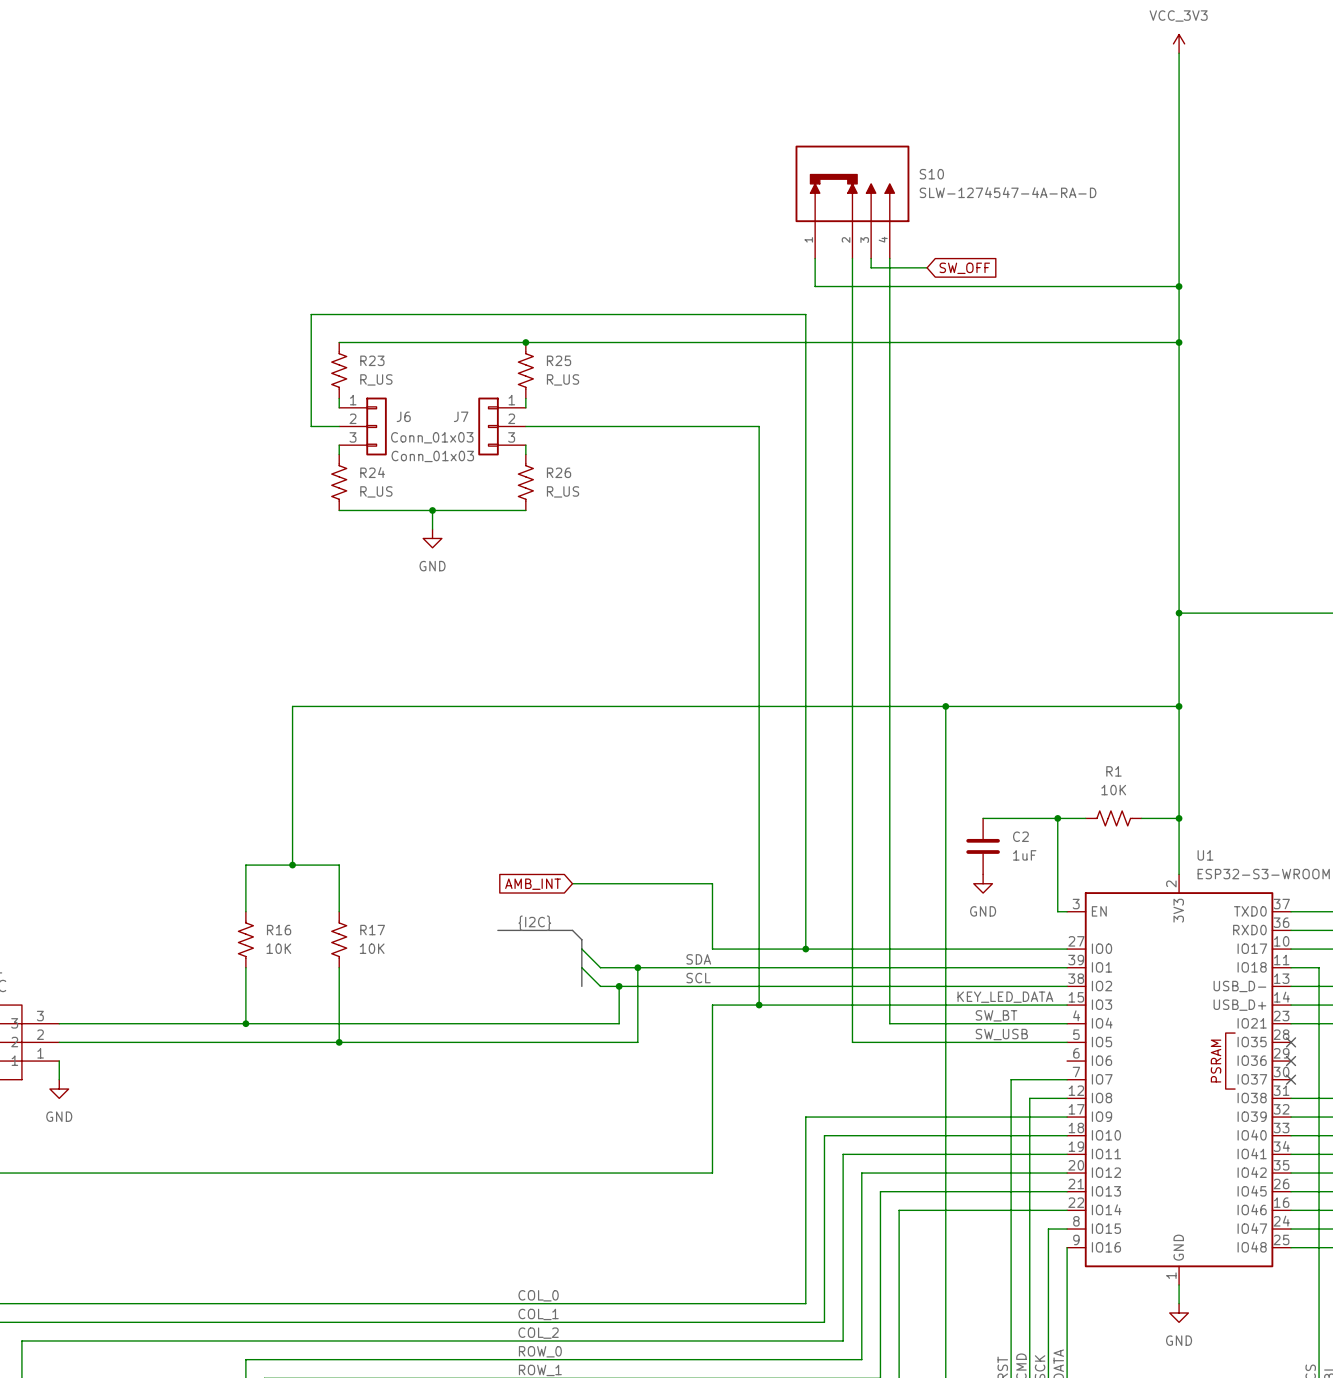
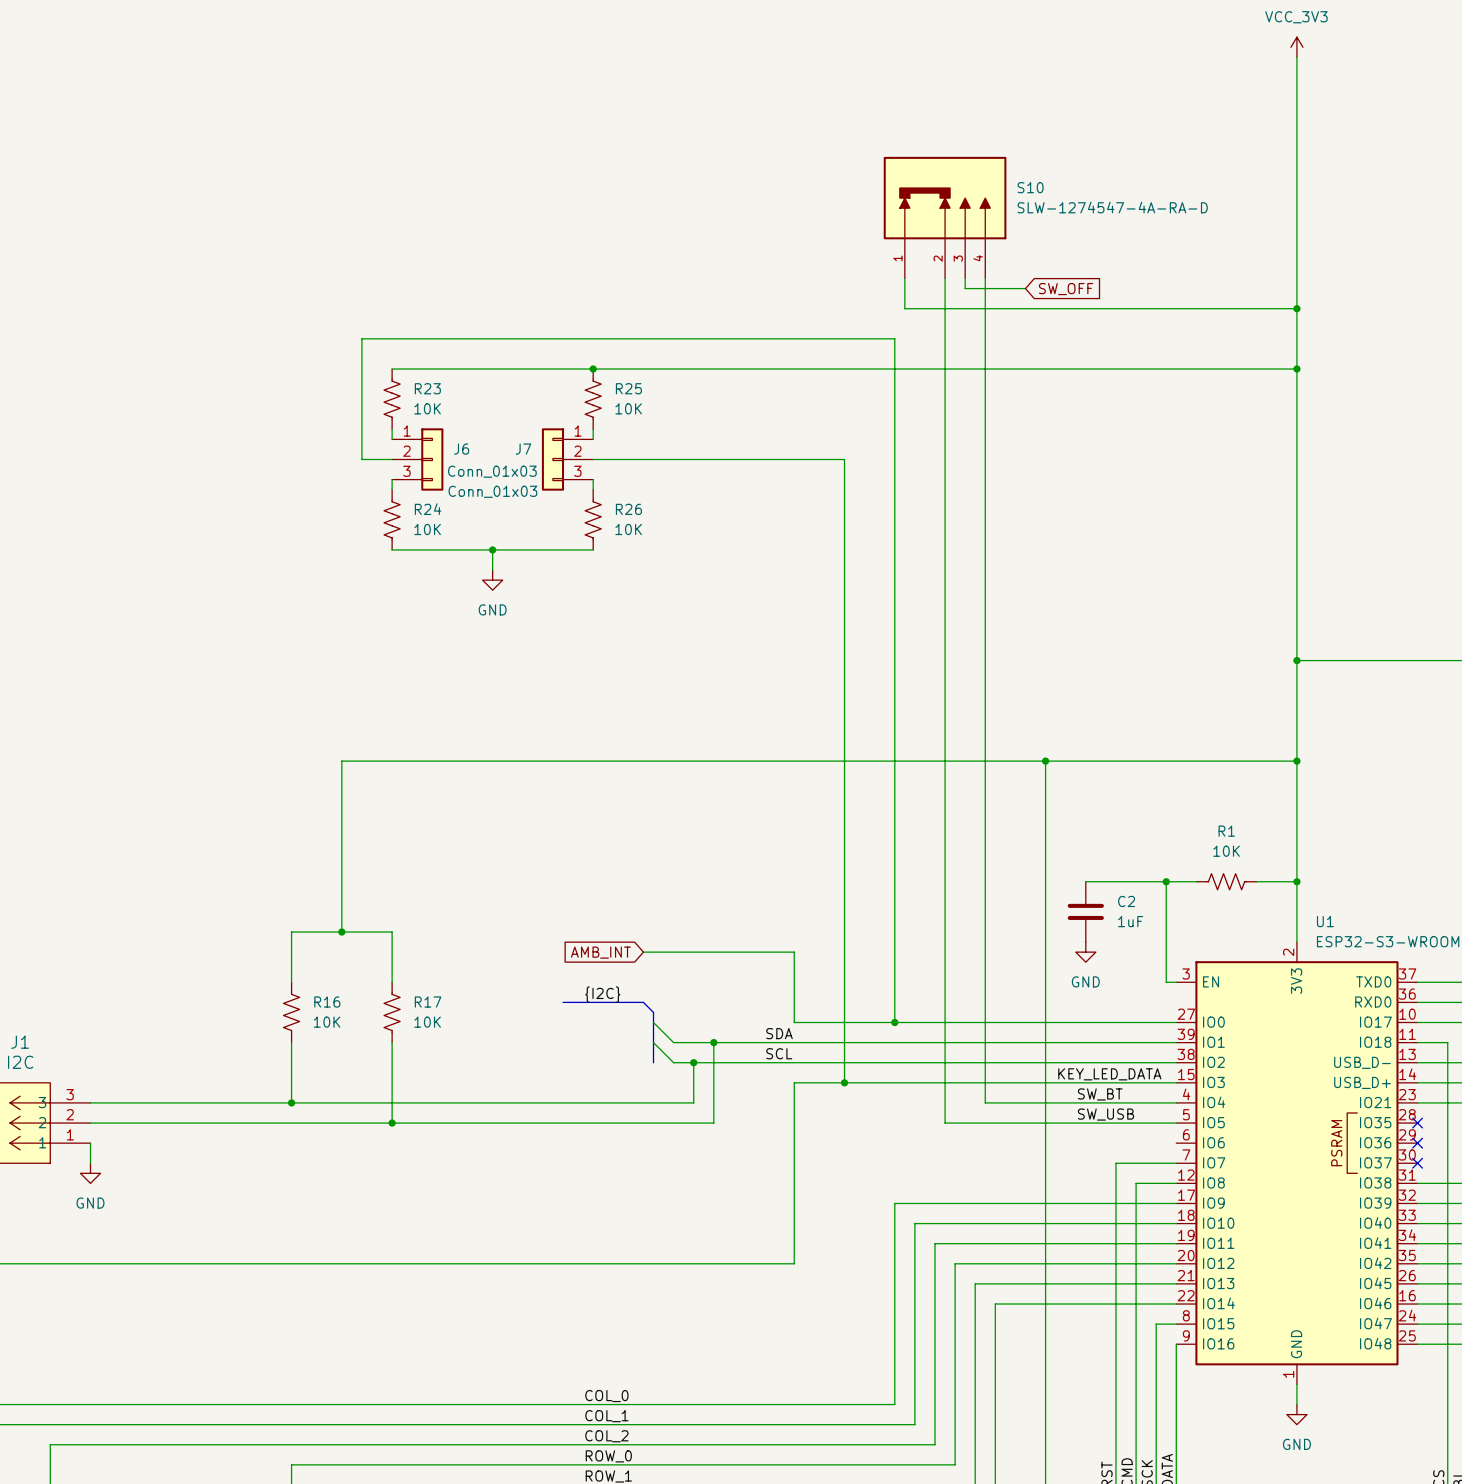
R23 value: R_US (376, 379) -> 10K (427, 408)
R25 value: R_US (563, 379) -> 10K (628, 408)
R24 value: R_US (376, 491) -> 10K (427, 529)
R26 value: R_US (563, 491) -> 10K (628, 529)

